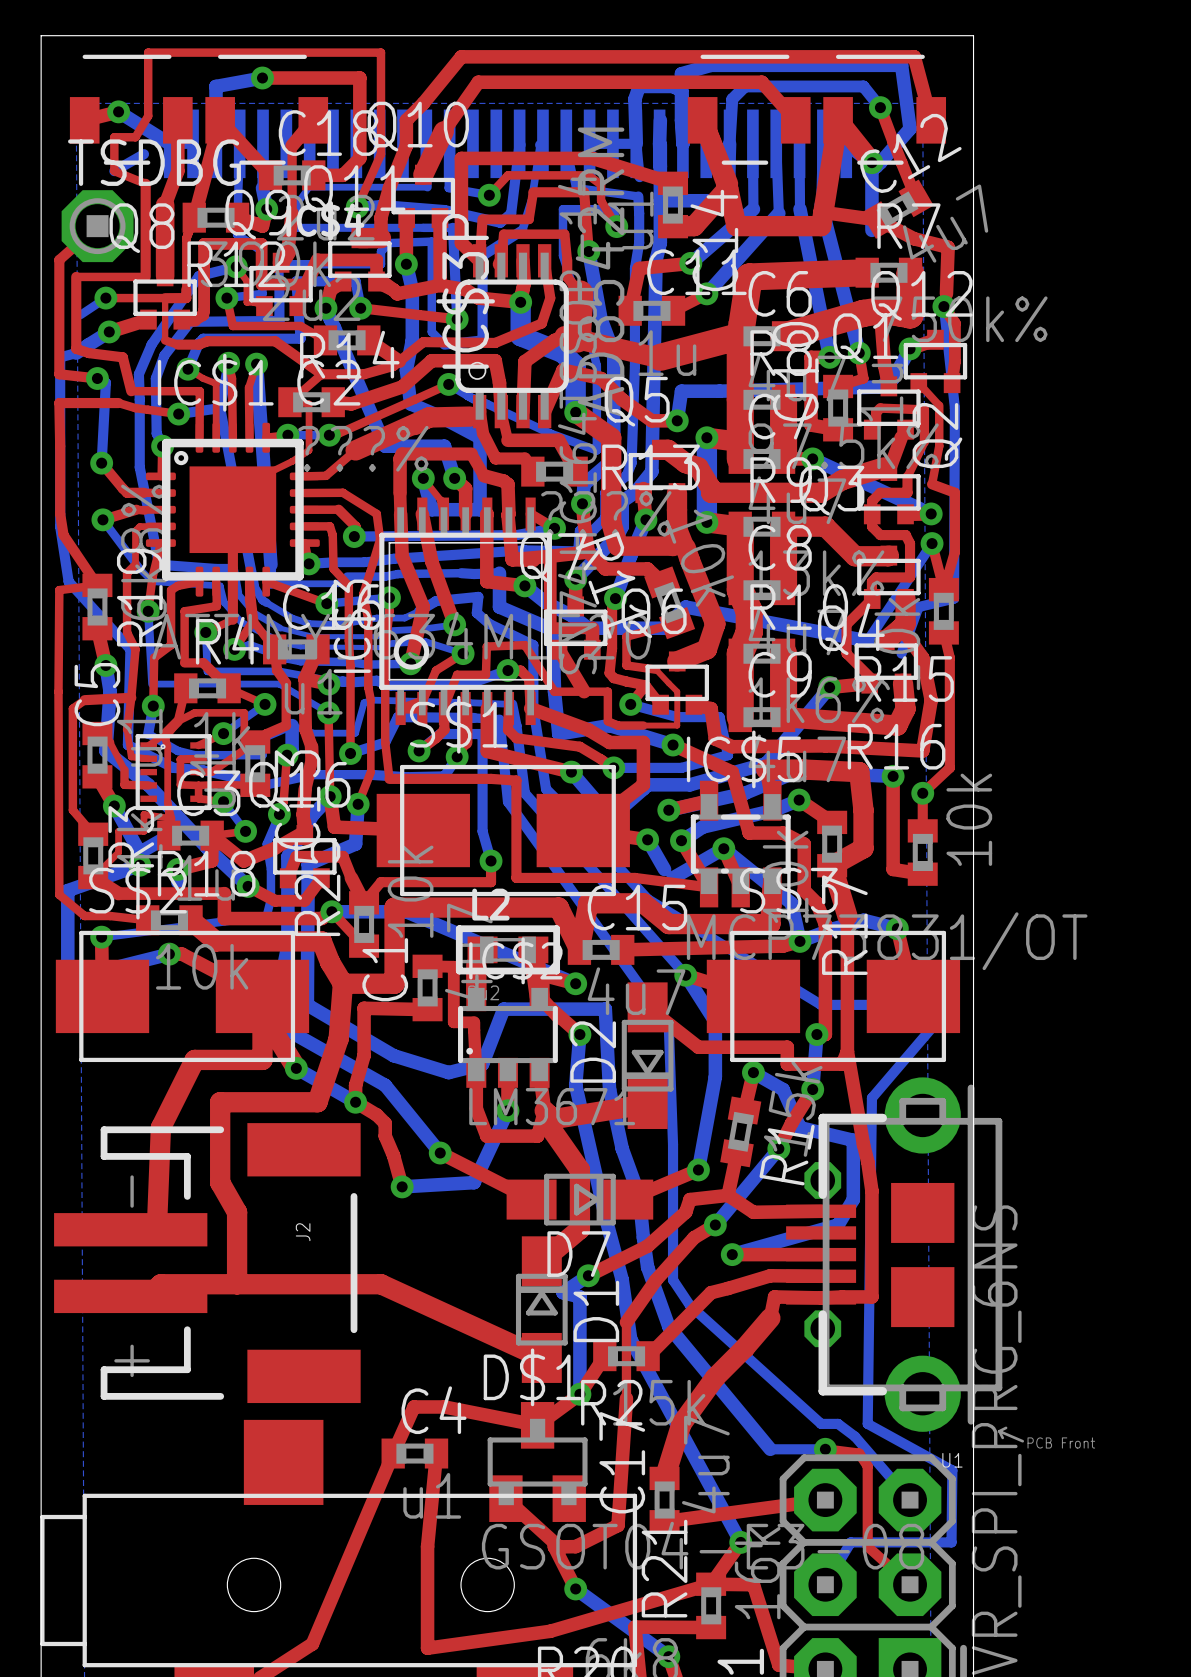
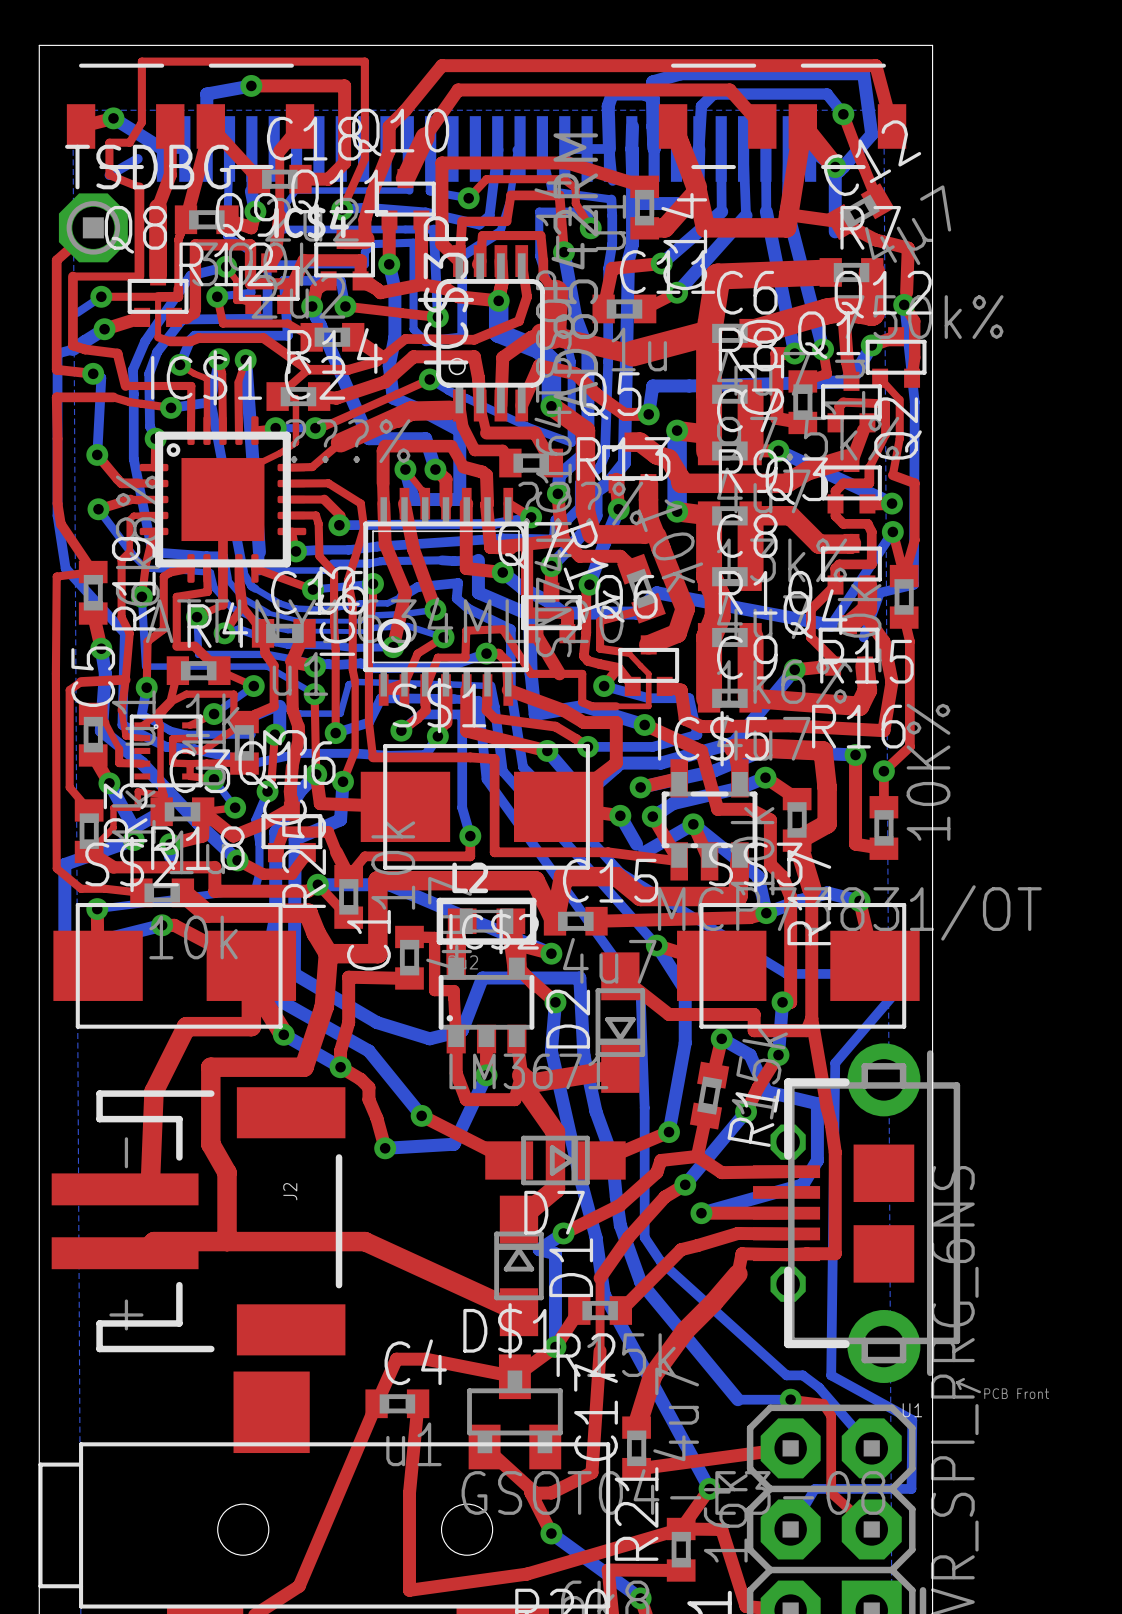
C12 value: 4u7 (945, 223) -> 4µ7 (908, 225)
R16 value: 10k (969, 819) -> 10K% (928, 772)

